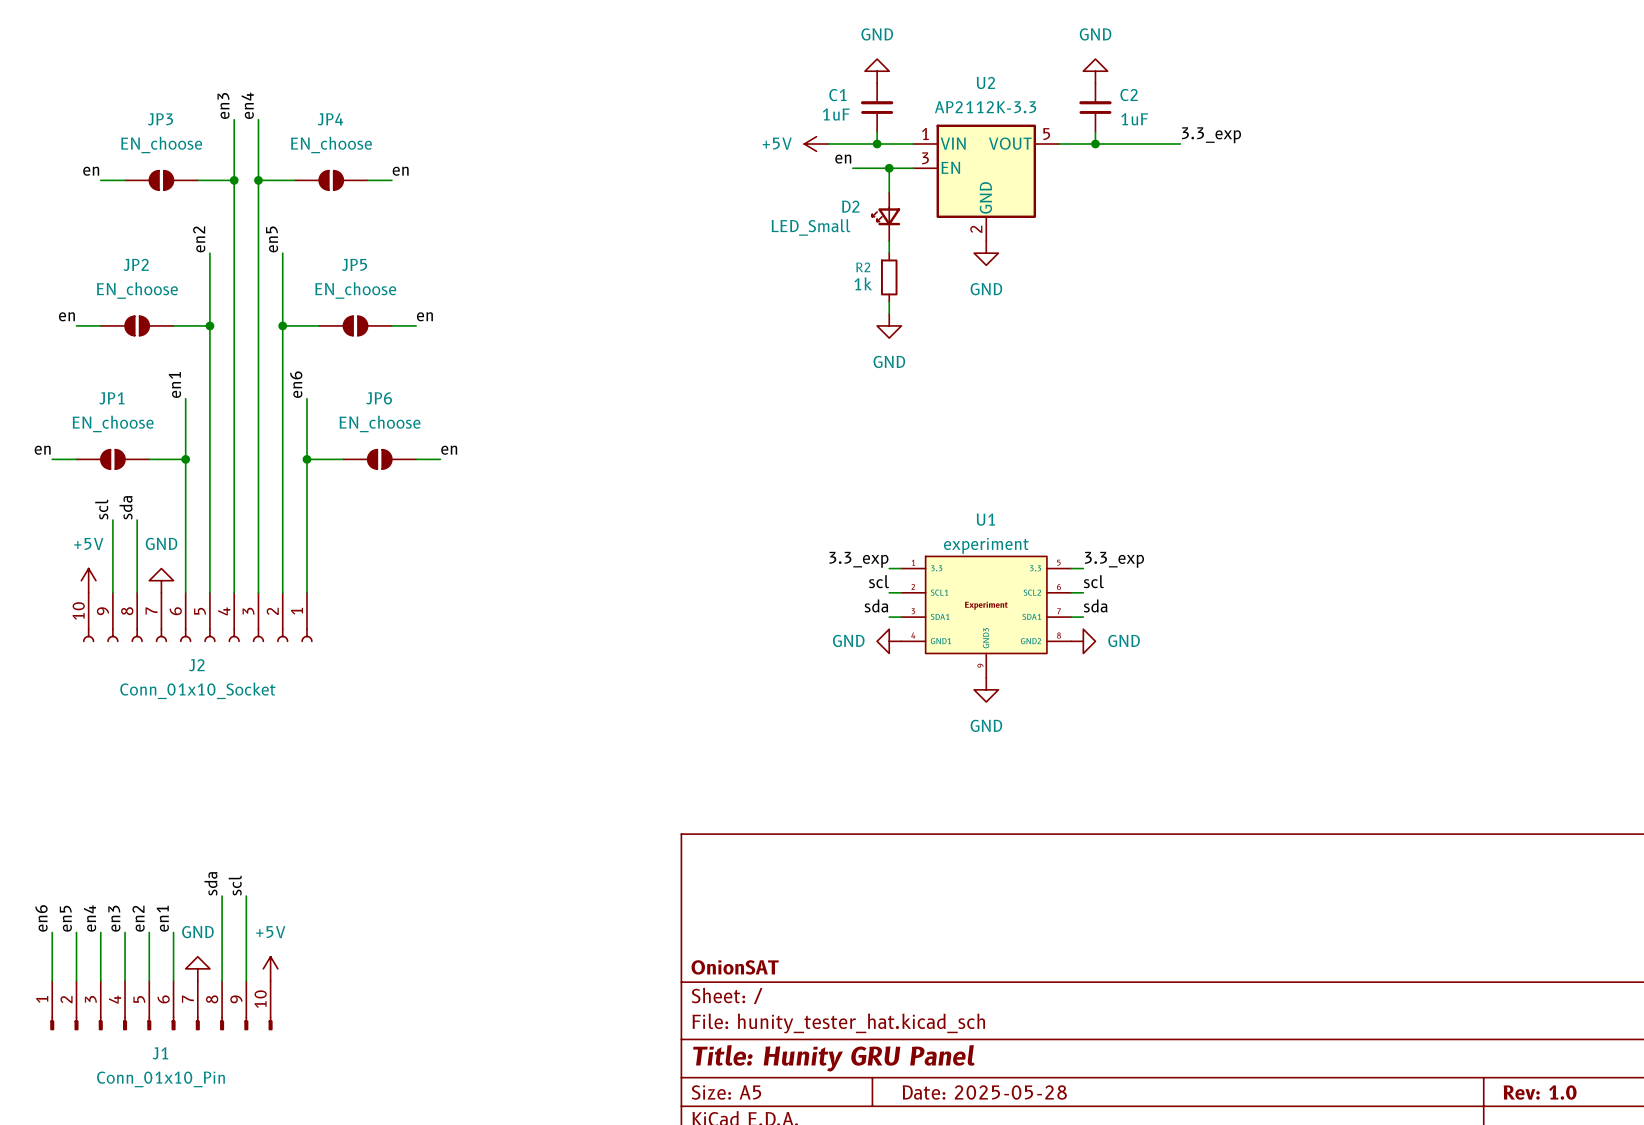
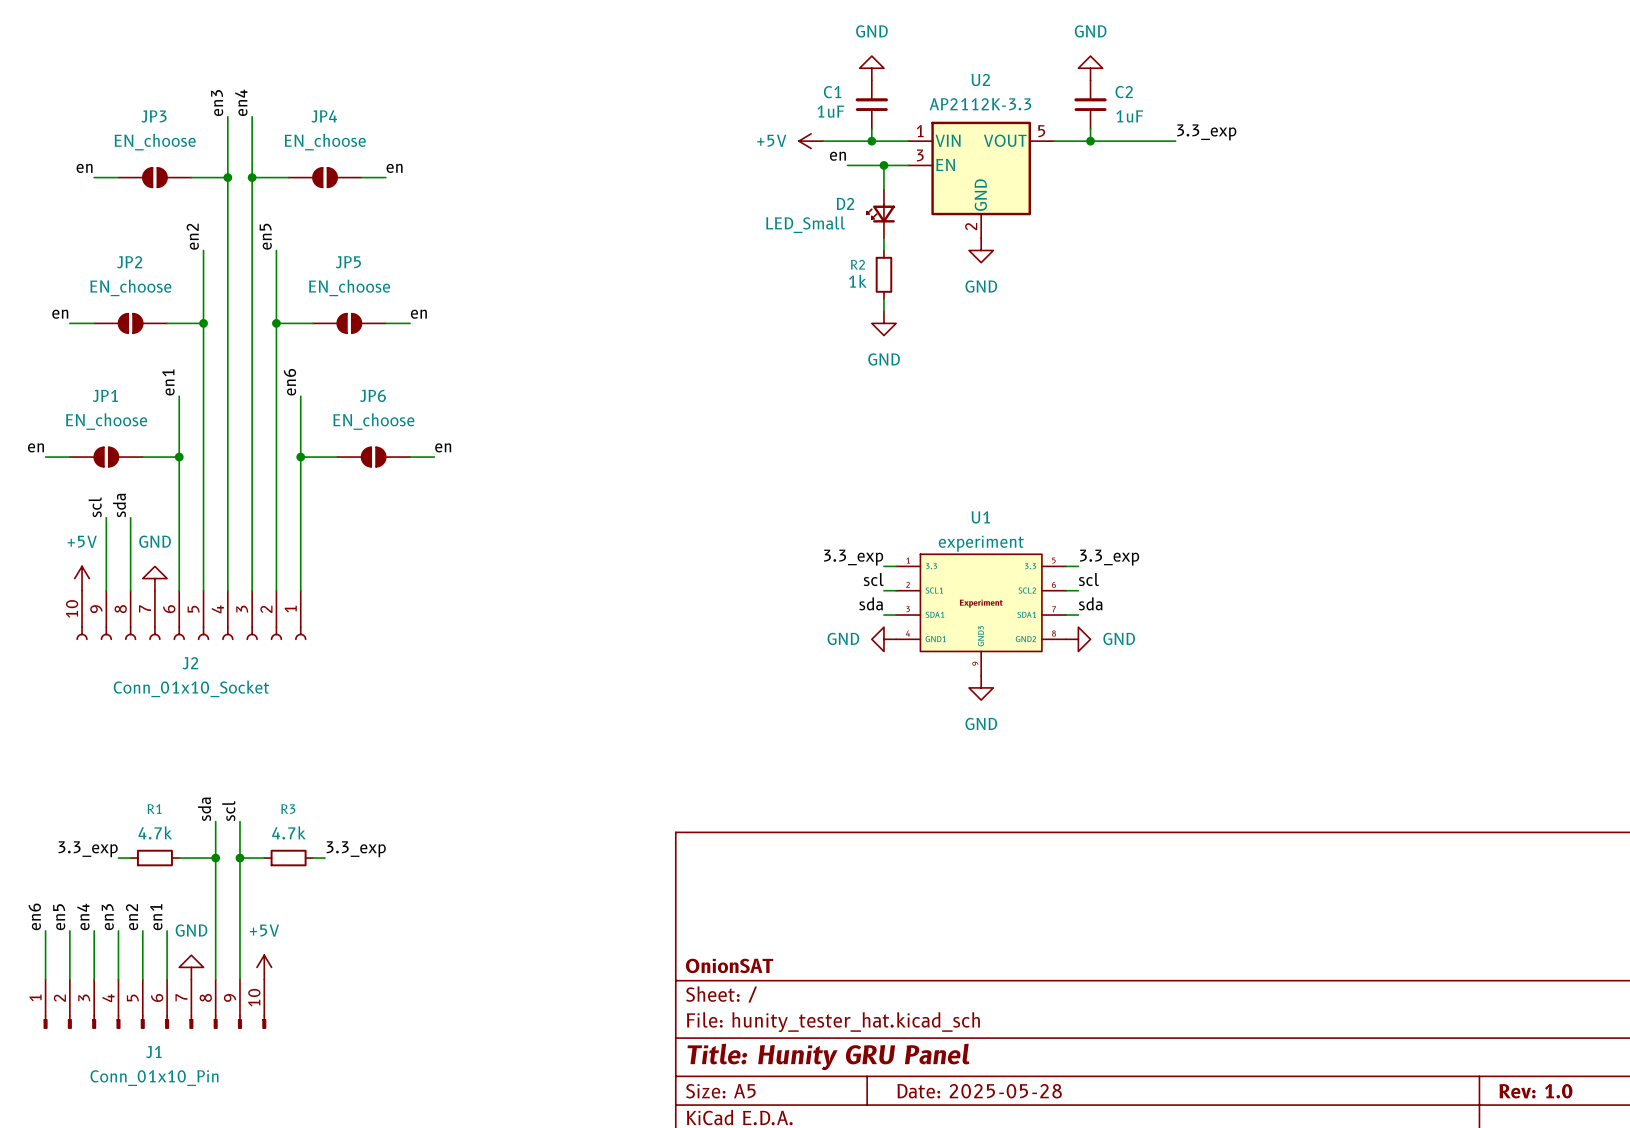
wire: none -> (215, 821) (215, 894)
wire: none -> (239, 821) (239, 894)
label: none -> 3.3_exp (88, 849)
label: none -> 3.3_exp (356, 849)
wire: none -> (118, 858) (130, 858)
R1: none -> 4.7k (154, 858)
wire: none -> (179, 858) (215, 858)
junction: none -> (215, 858)
wire: none -> (239, 858) (264, 858)
junction: none -> (239, 858)
R3: none -> 4.7k (288, 858)
wire: none -> (312, 858) (325, 858)
label position: sda (210, 883) -> sda (204, 809)
label position: scl (235, 885) -> scl (228, 811)

